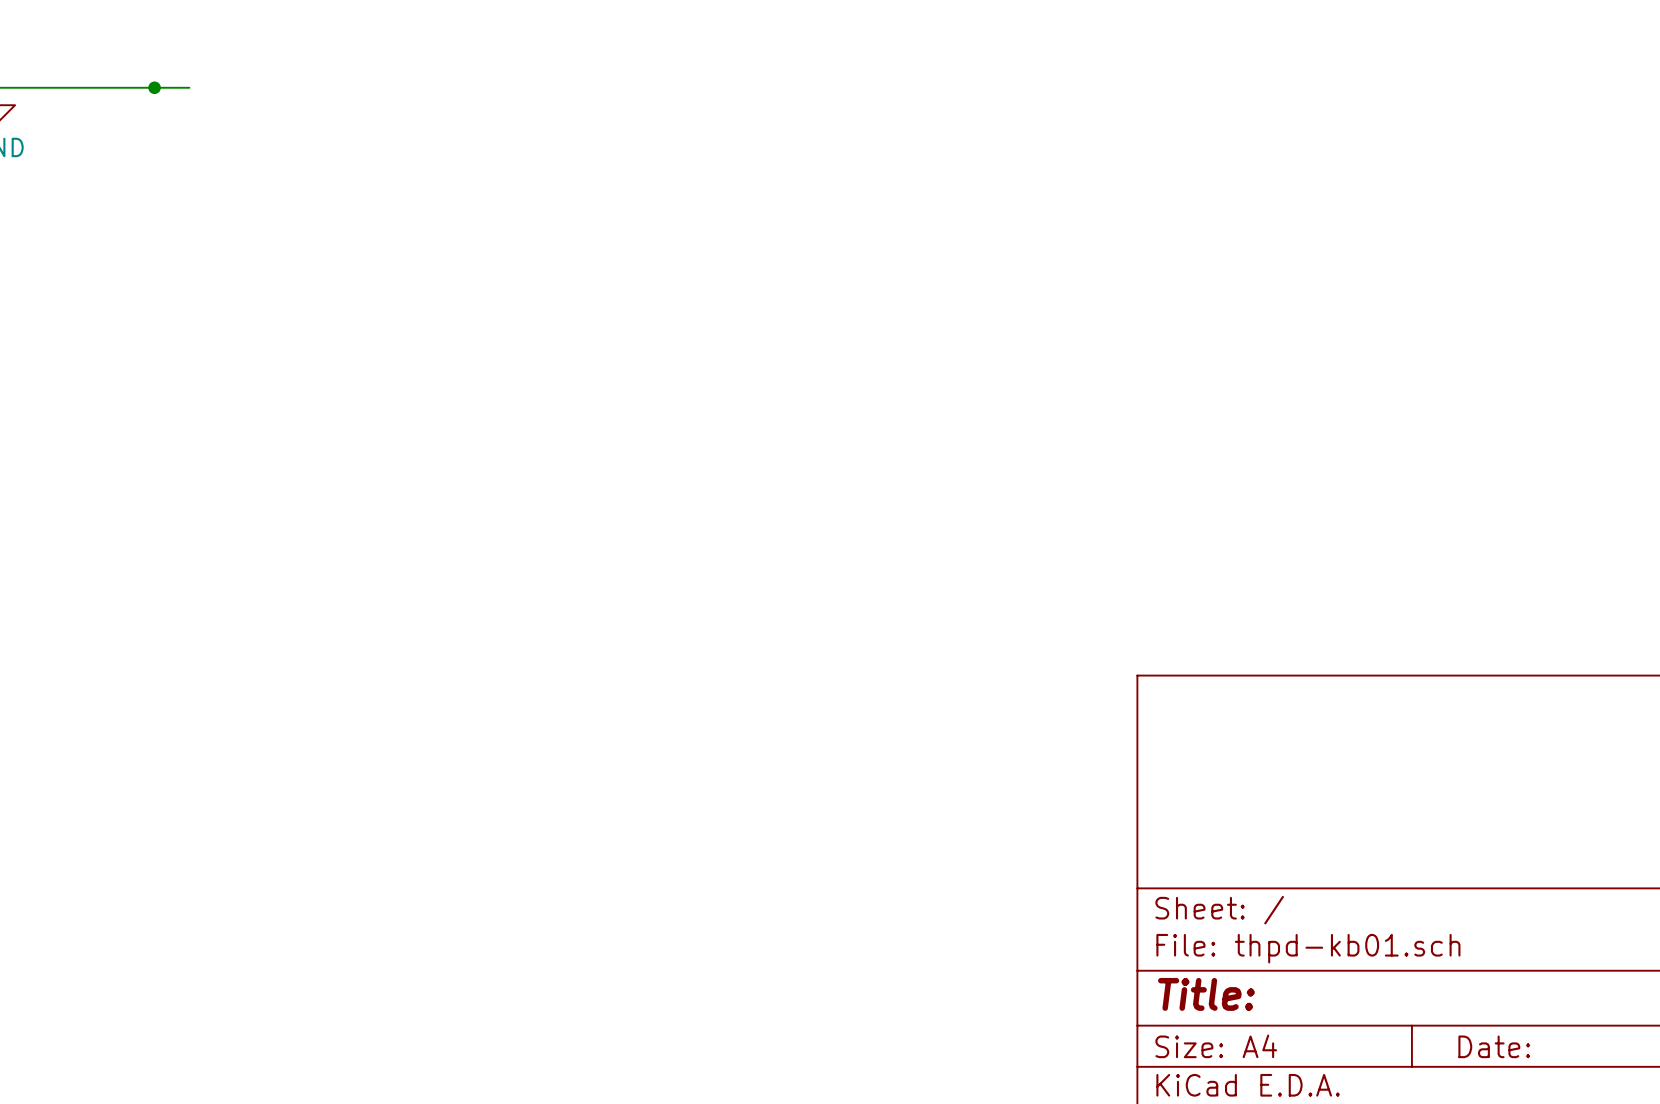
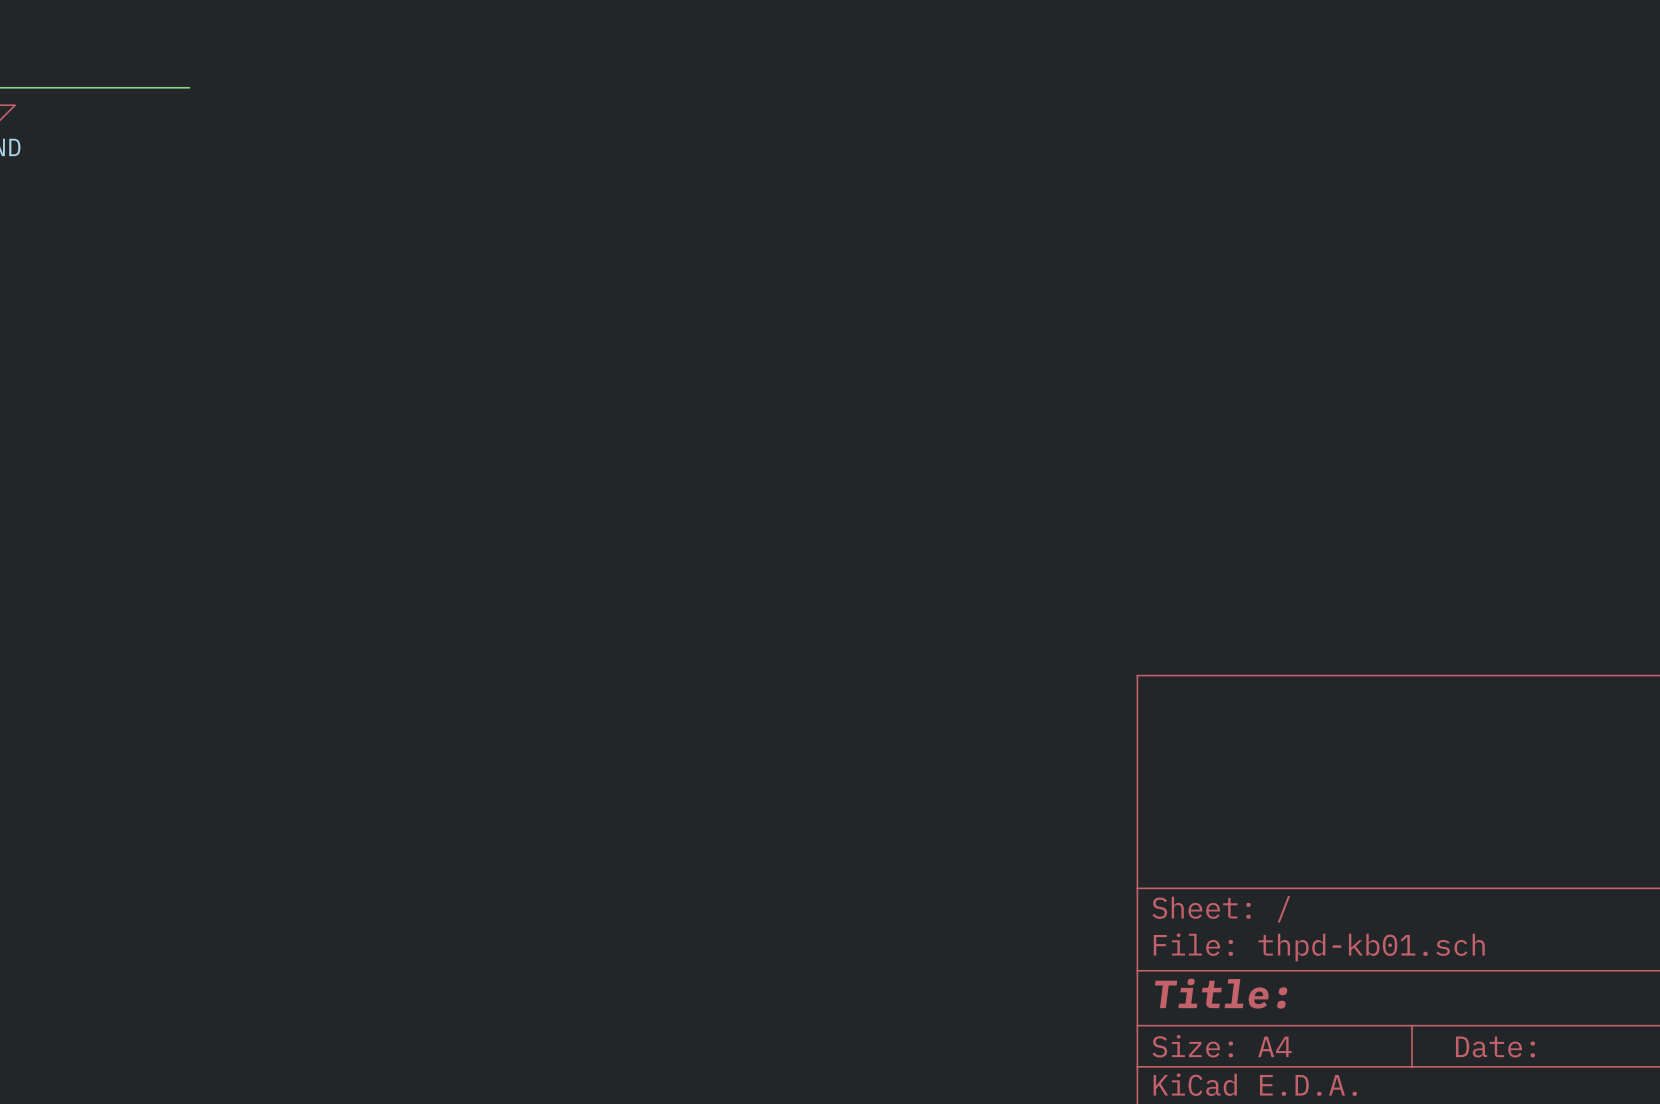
junction: (154, 87) -> none

